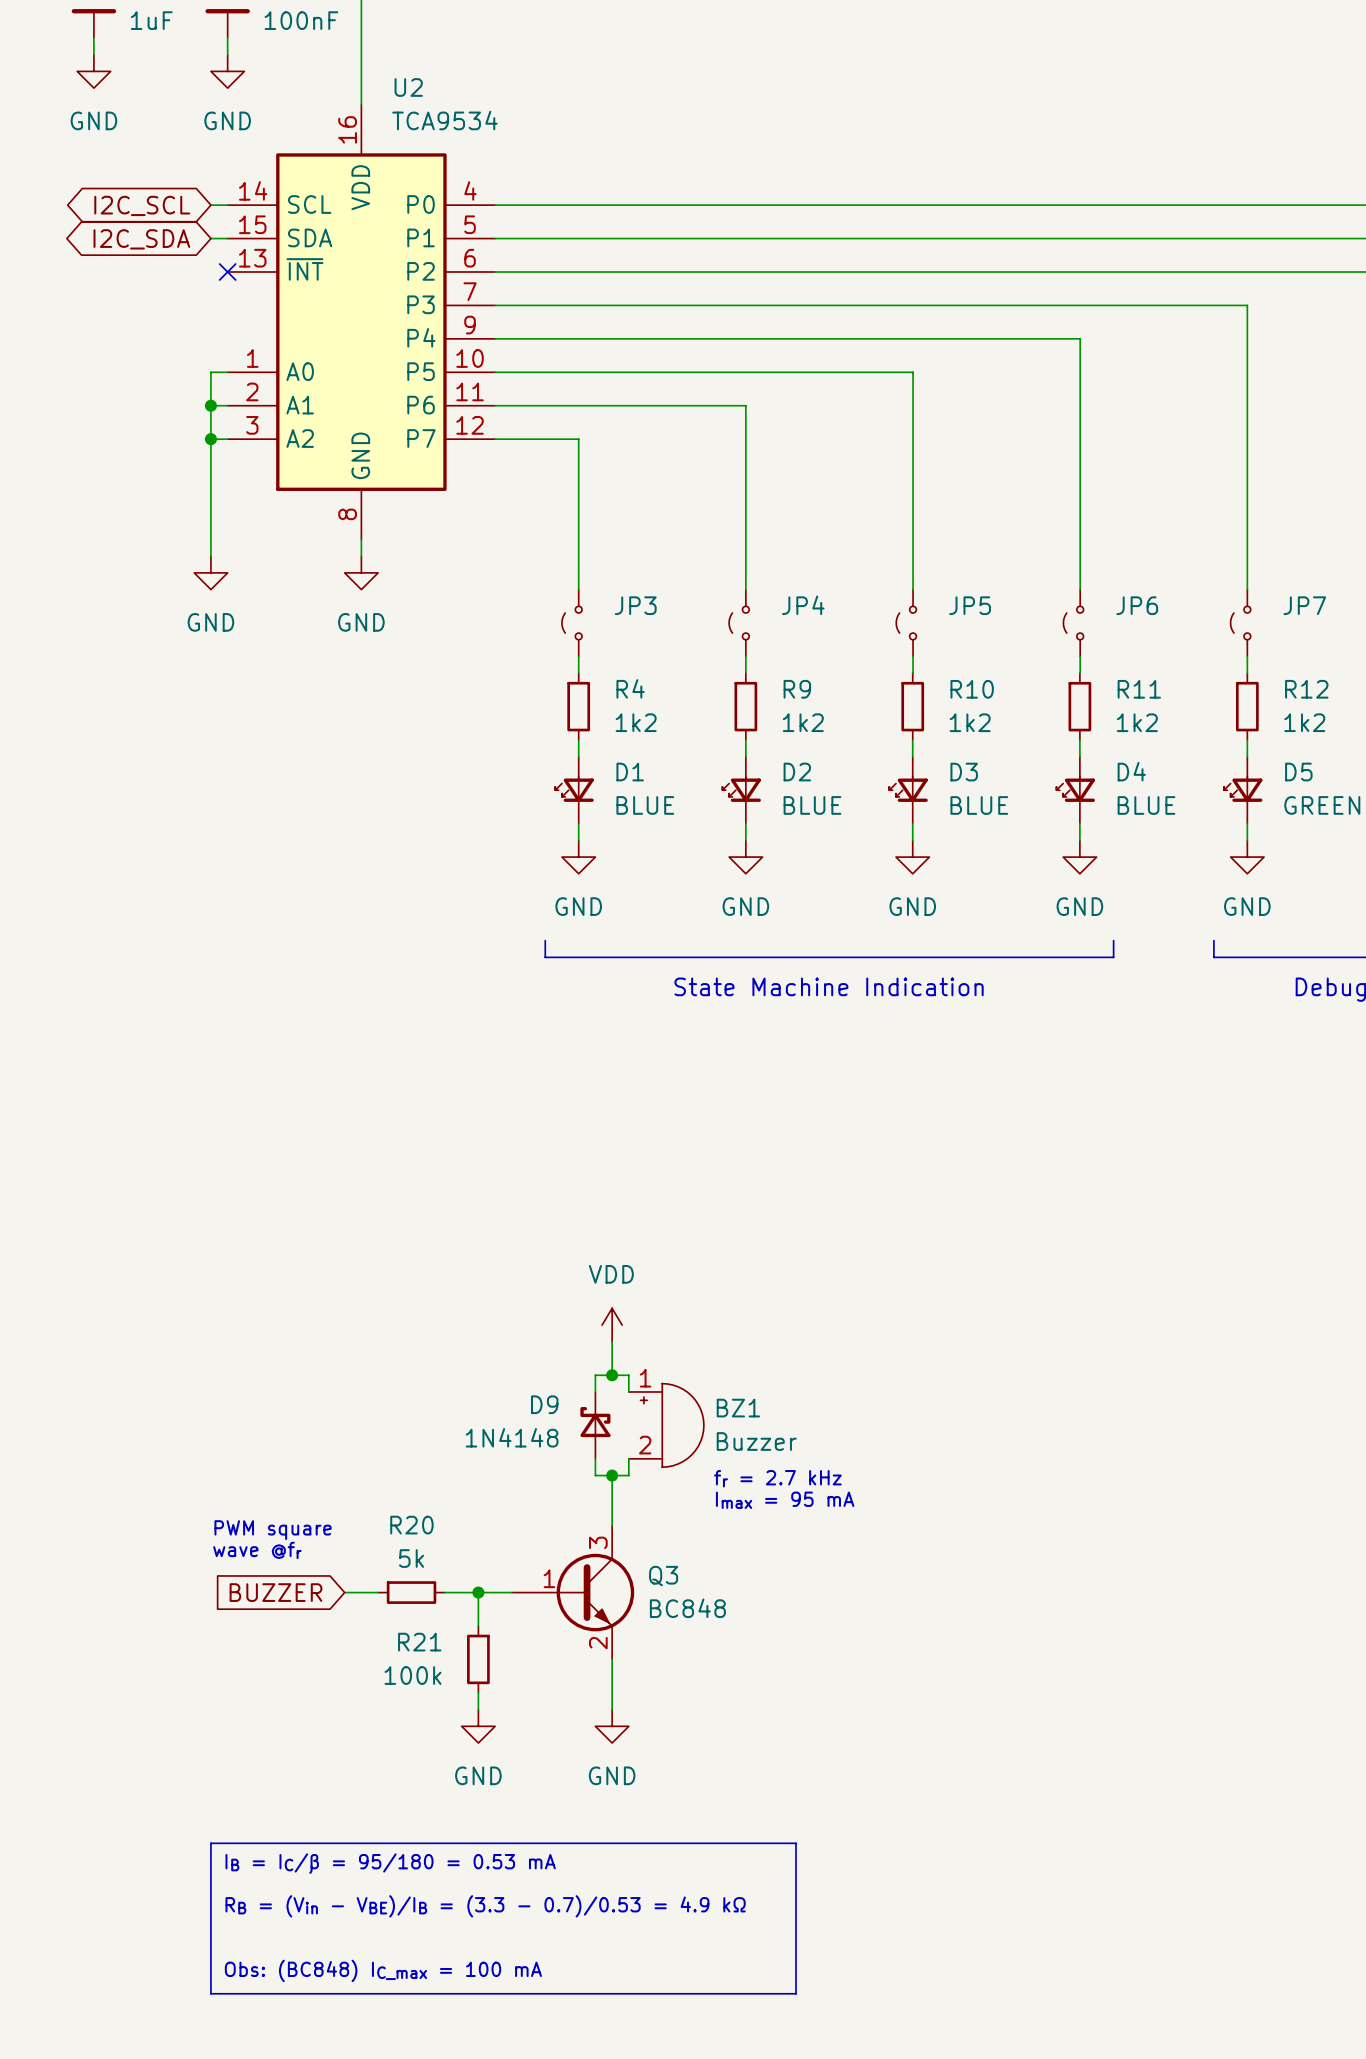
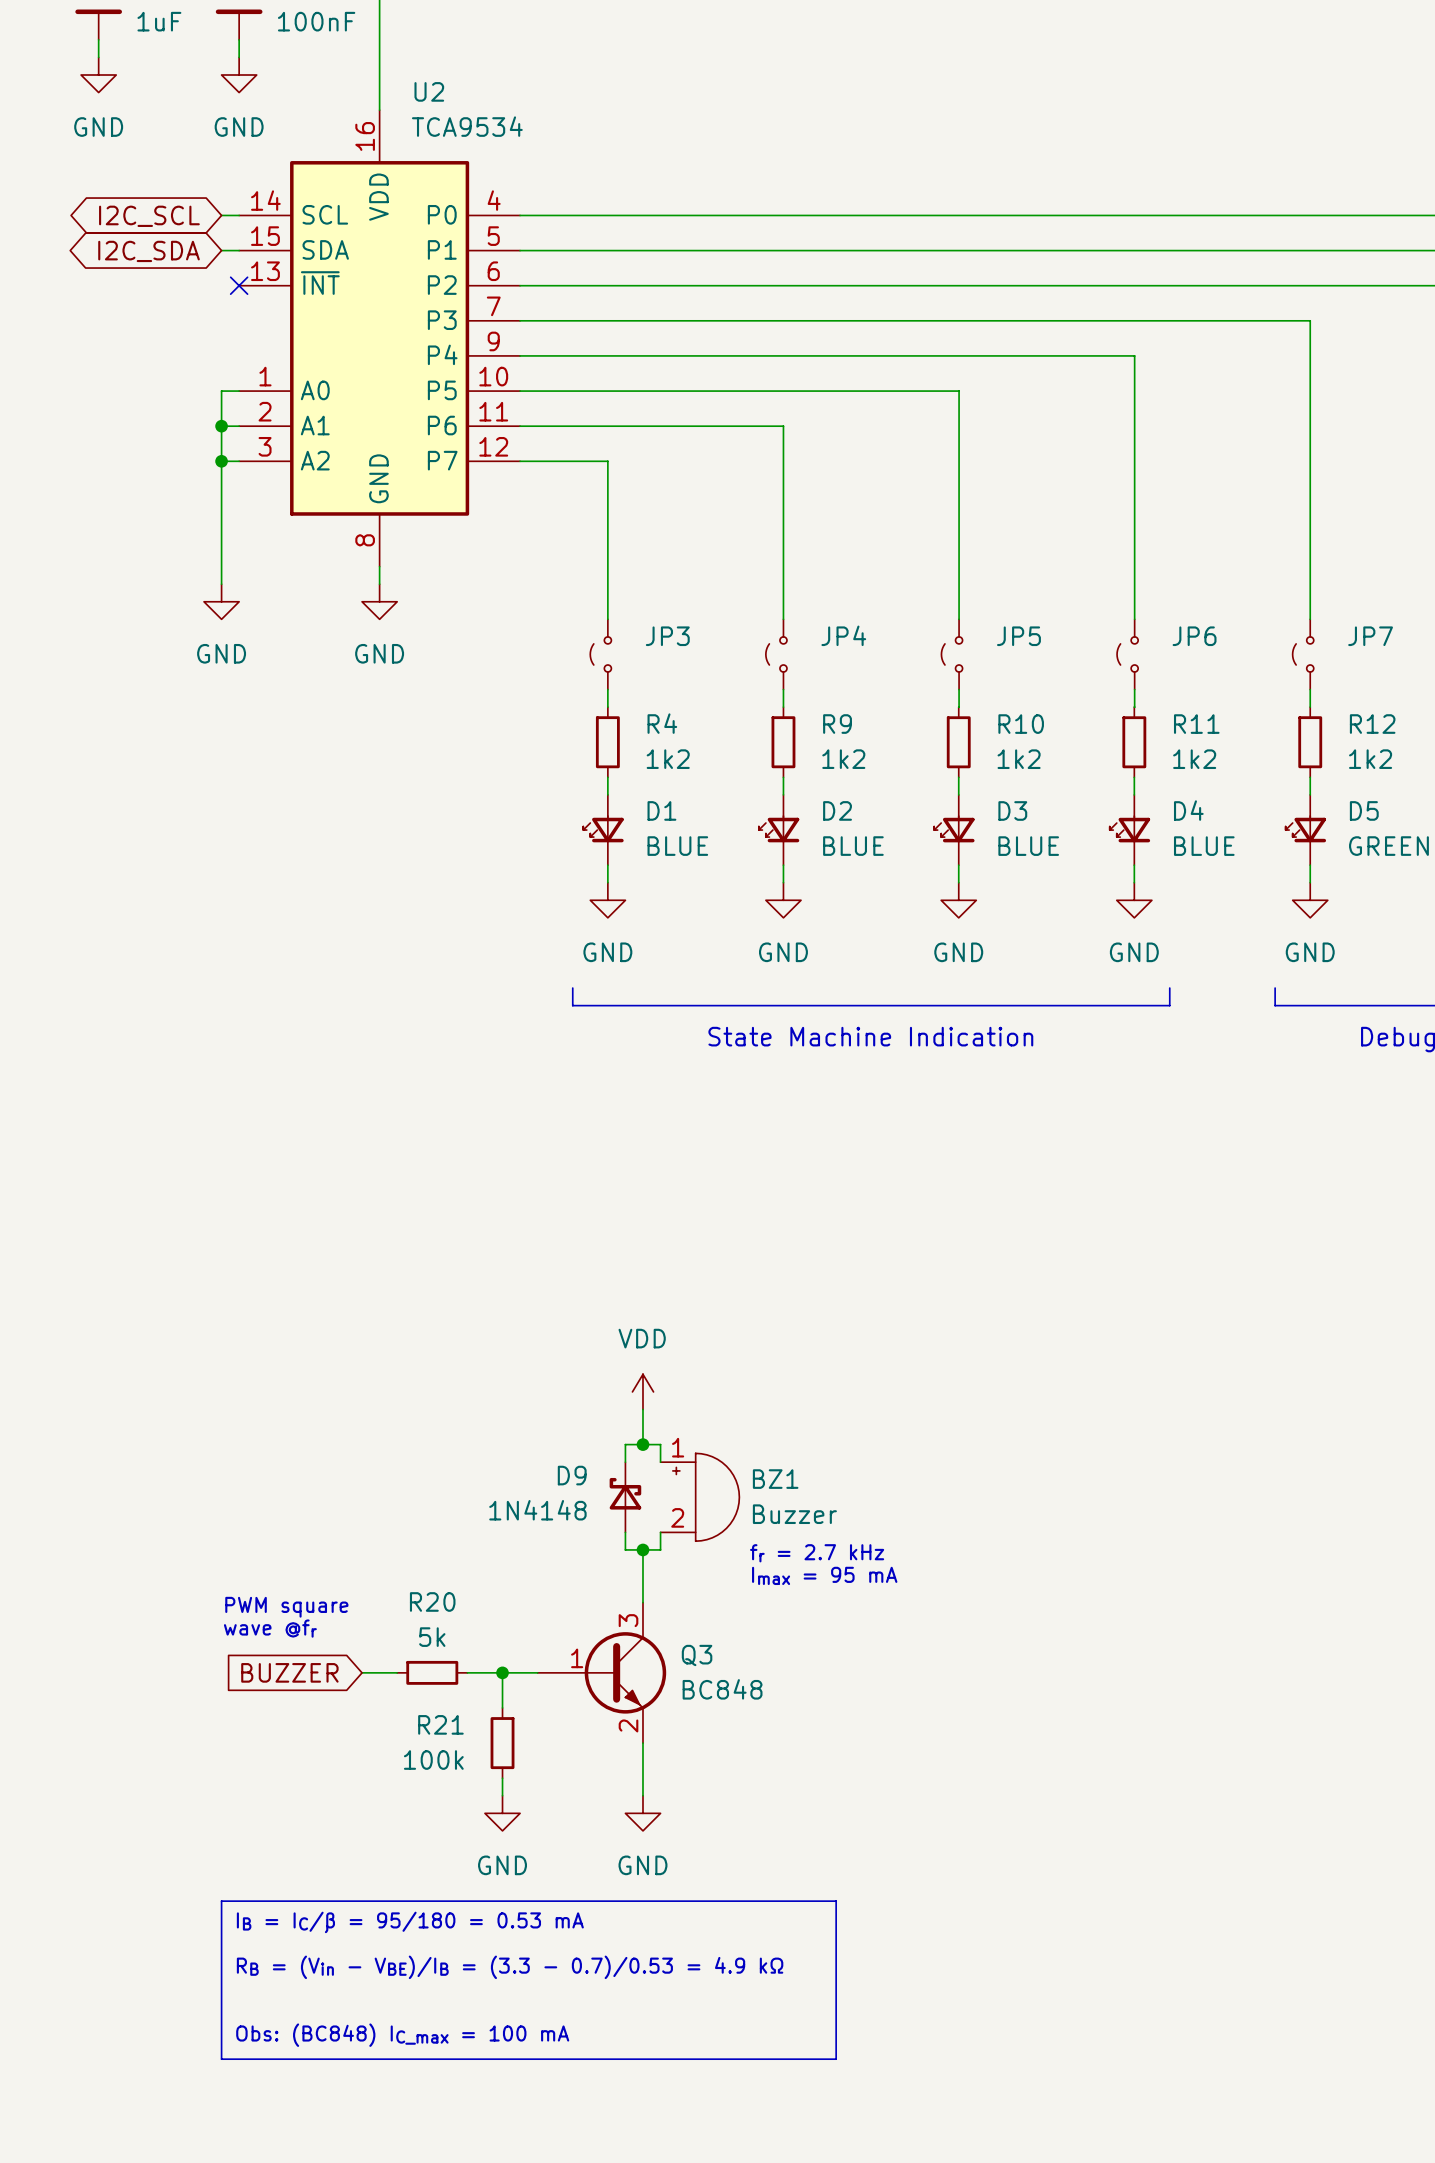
text: none -> IB = IC/β = 95/180 = 0.53 mA (410, 1922)
line: (210, 1843) (796, 1843) -> (221, 1936) (221, 1901) (836, 1901) (836, 1936)
text: IB = IC/β = 95/180 = 0.53 mA (390, 1863) -> RB = (Vin - VBE)/IB = (3.3 - 0.7)/0.53 = 4.9 kΩ (510, 1967)
text: RB = (Vin - VBE)/IB = (3.3 - 0.7)/0.53 = 4.9 kΩ (485, 1906) -> none
line: (210, 1960) (210, 1993) (796, 1993) (796, 1960) -> (221, 2059) (836, 2059)
text position: Obs: (BC848) IC_max = 100 mA (383, 1970) -> Obs: (BC848) IC_max = 100 mA (402, 2035)

